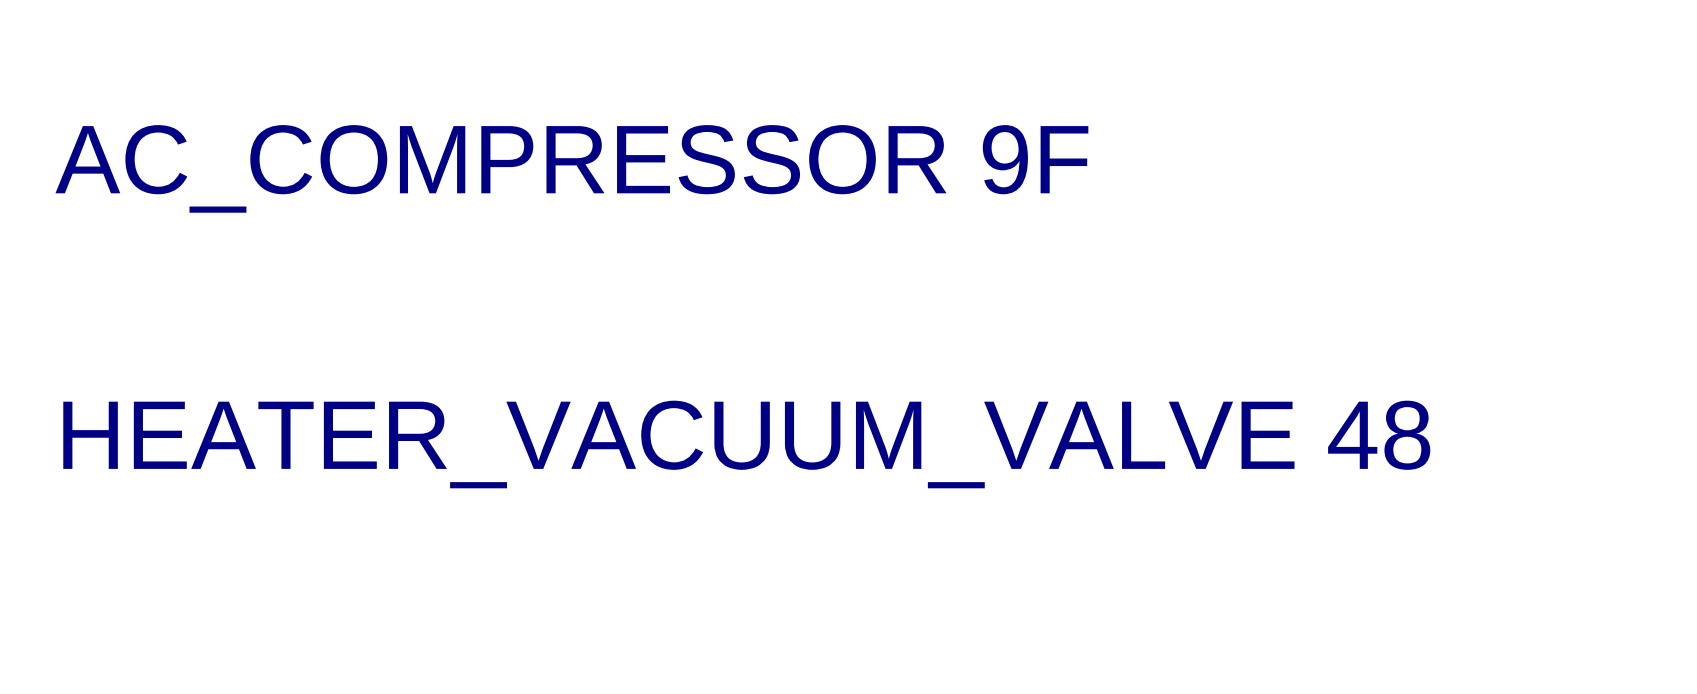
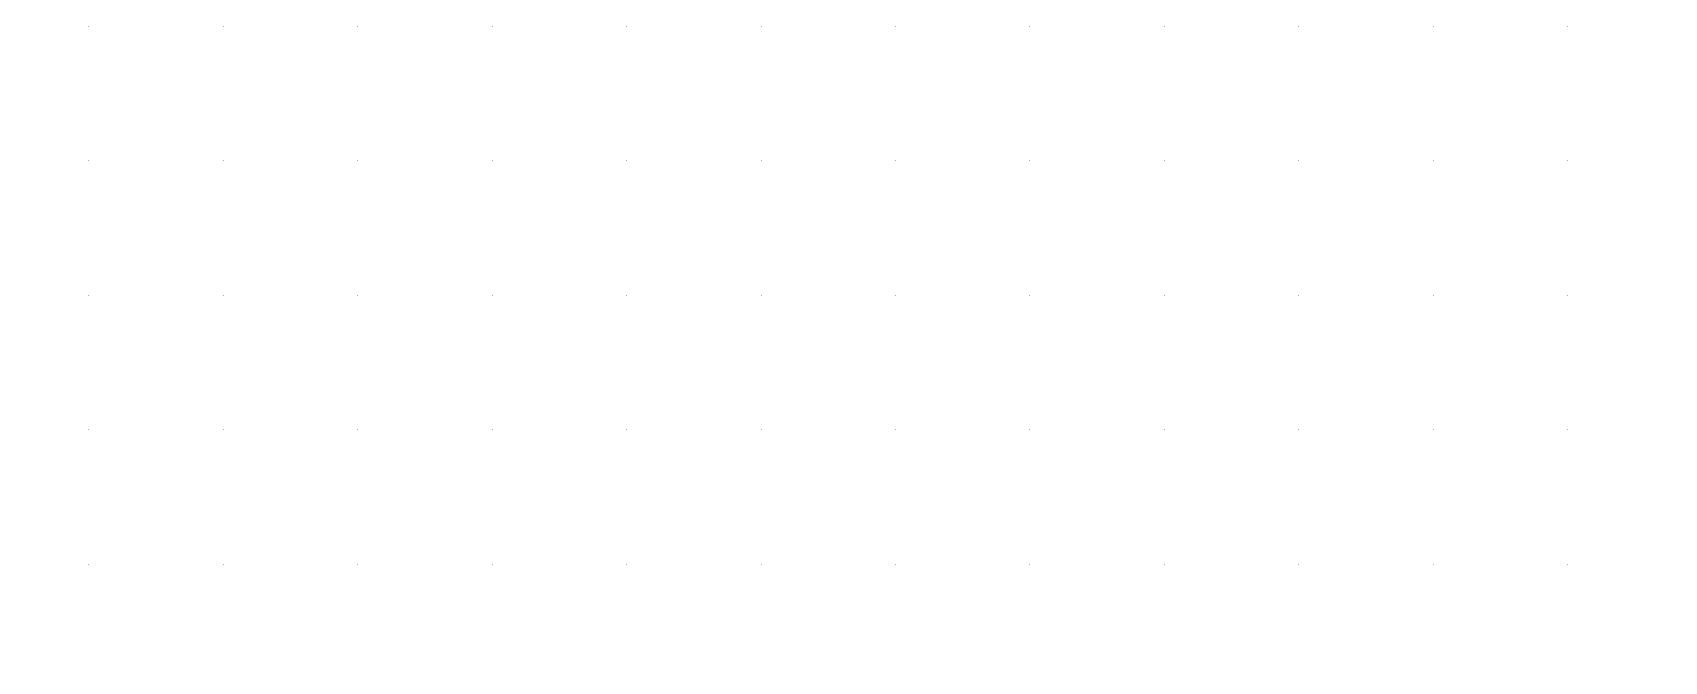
text: AC_COMPRESSOR 9F (571, 168) -> none
text: HEATER_VACUUM_VALVE 48 (746, 444) -> none

